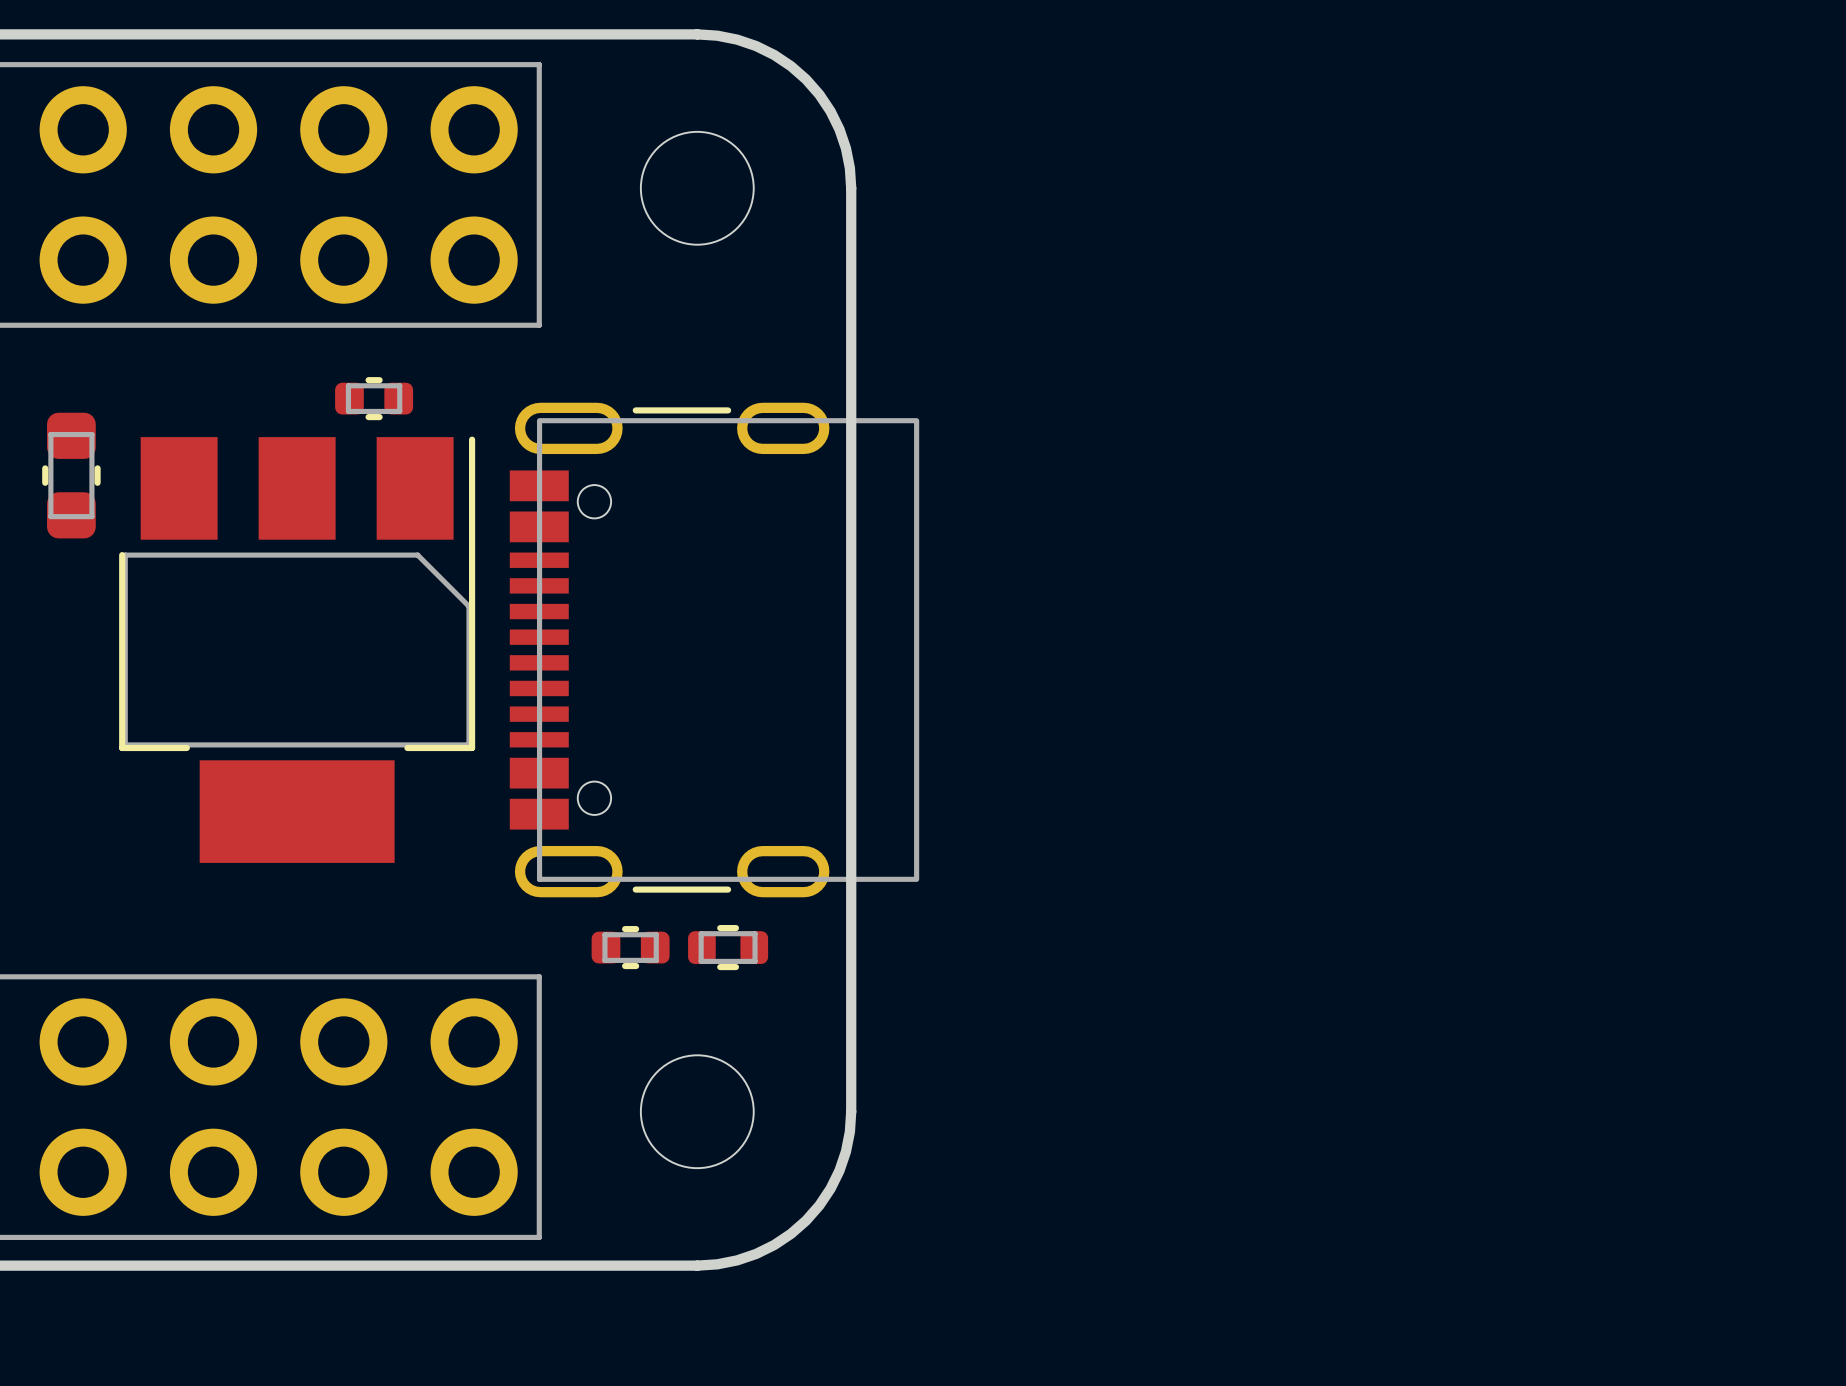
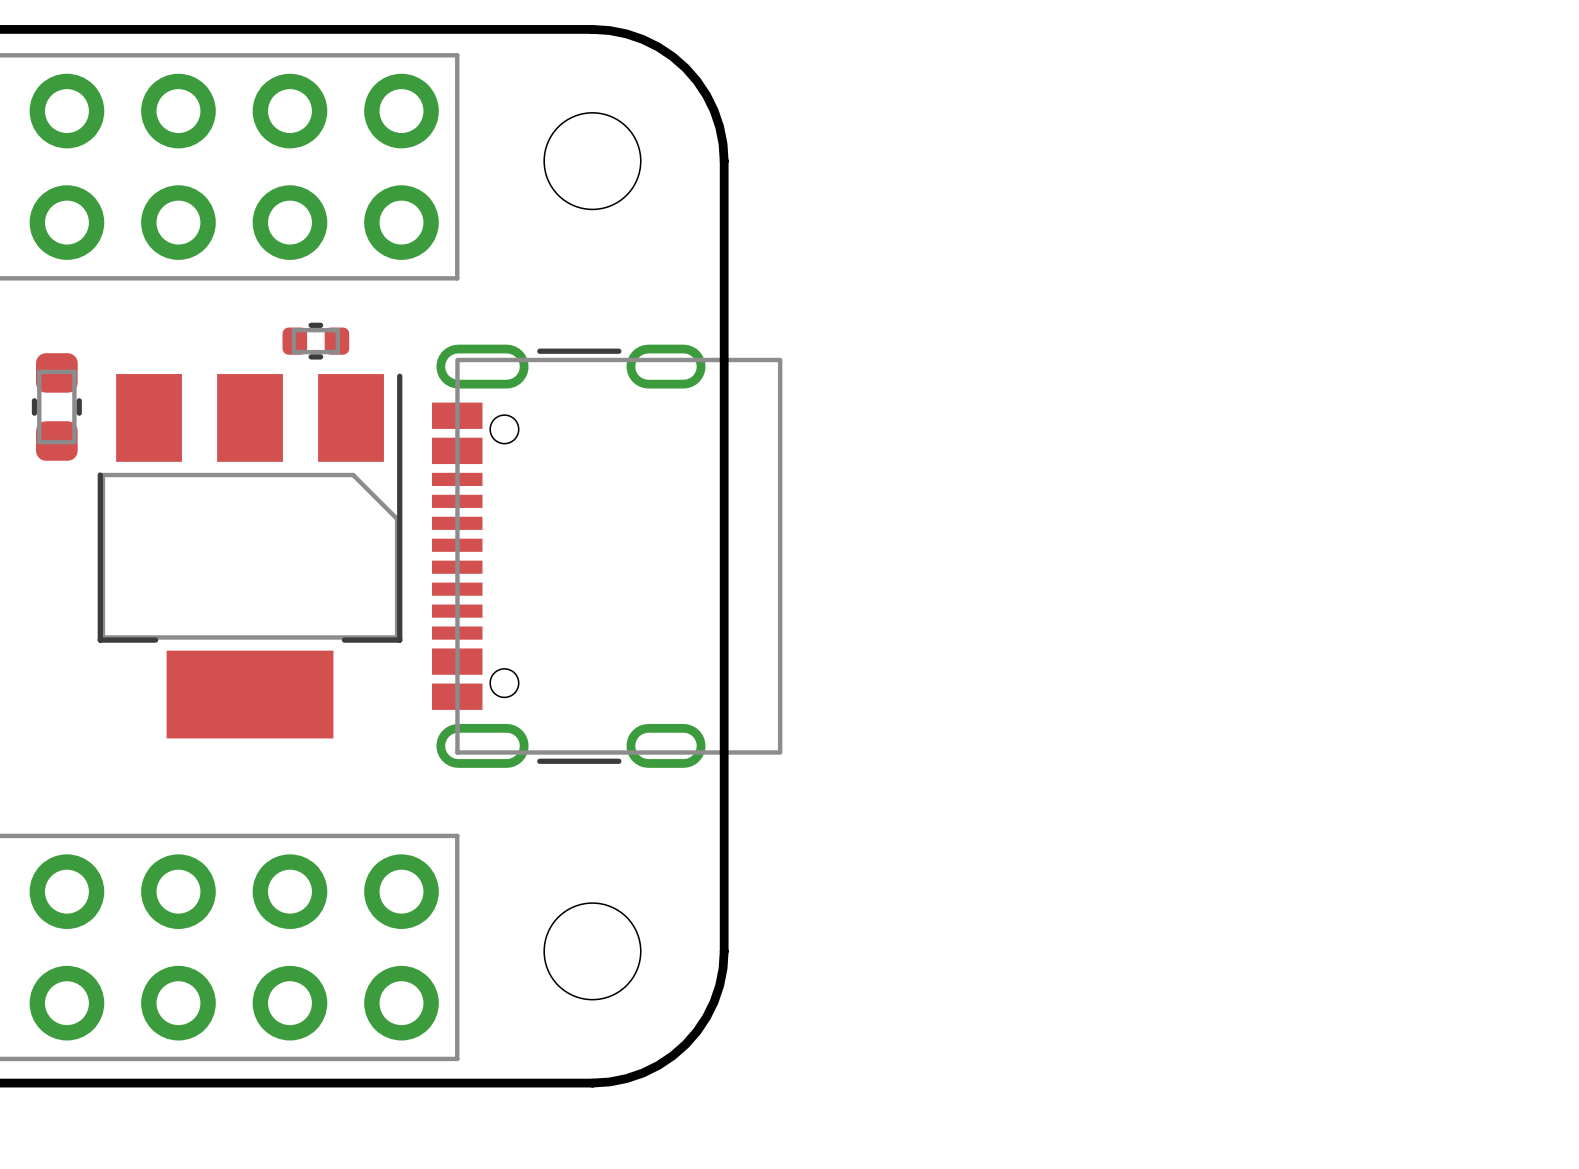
part: (630, 947) -> none
part: (728, 947) -> none

